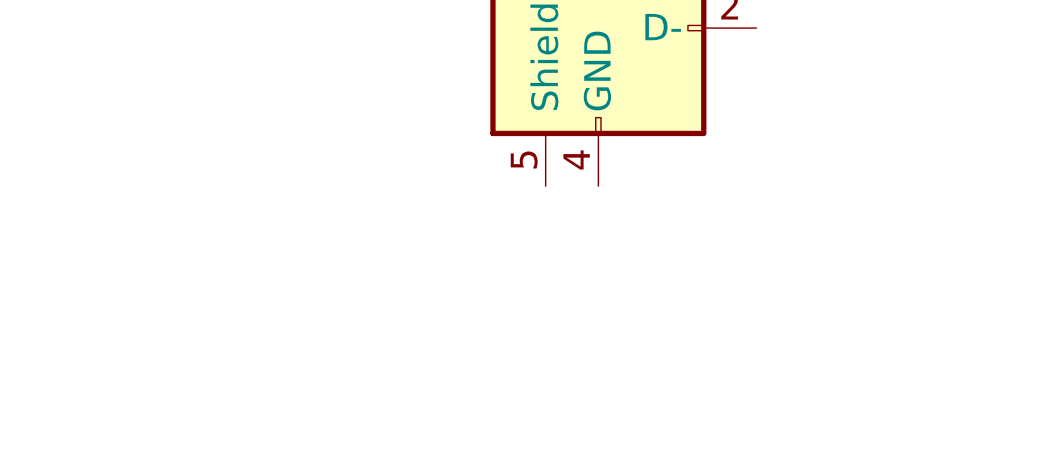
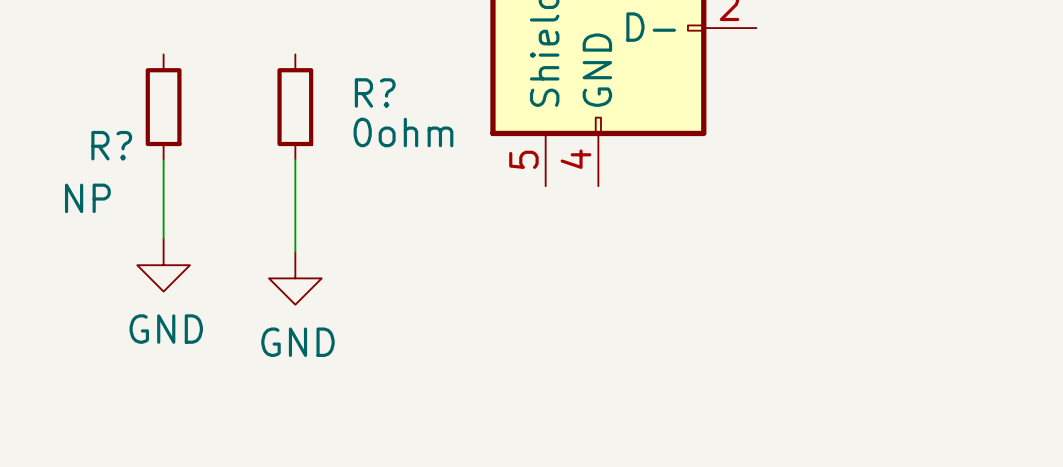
R?: none -> NP (163, 107)
R?: none -> 0ohm (295, 107)
wire: none -> (163, 159) (163, 238)
wire: none -> (295, 159) (295, 252)
power symbol: none -> GND (163, 265)
power symbol: none -> GND (295, 278)

